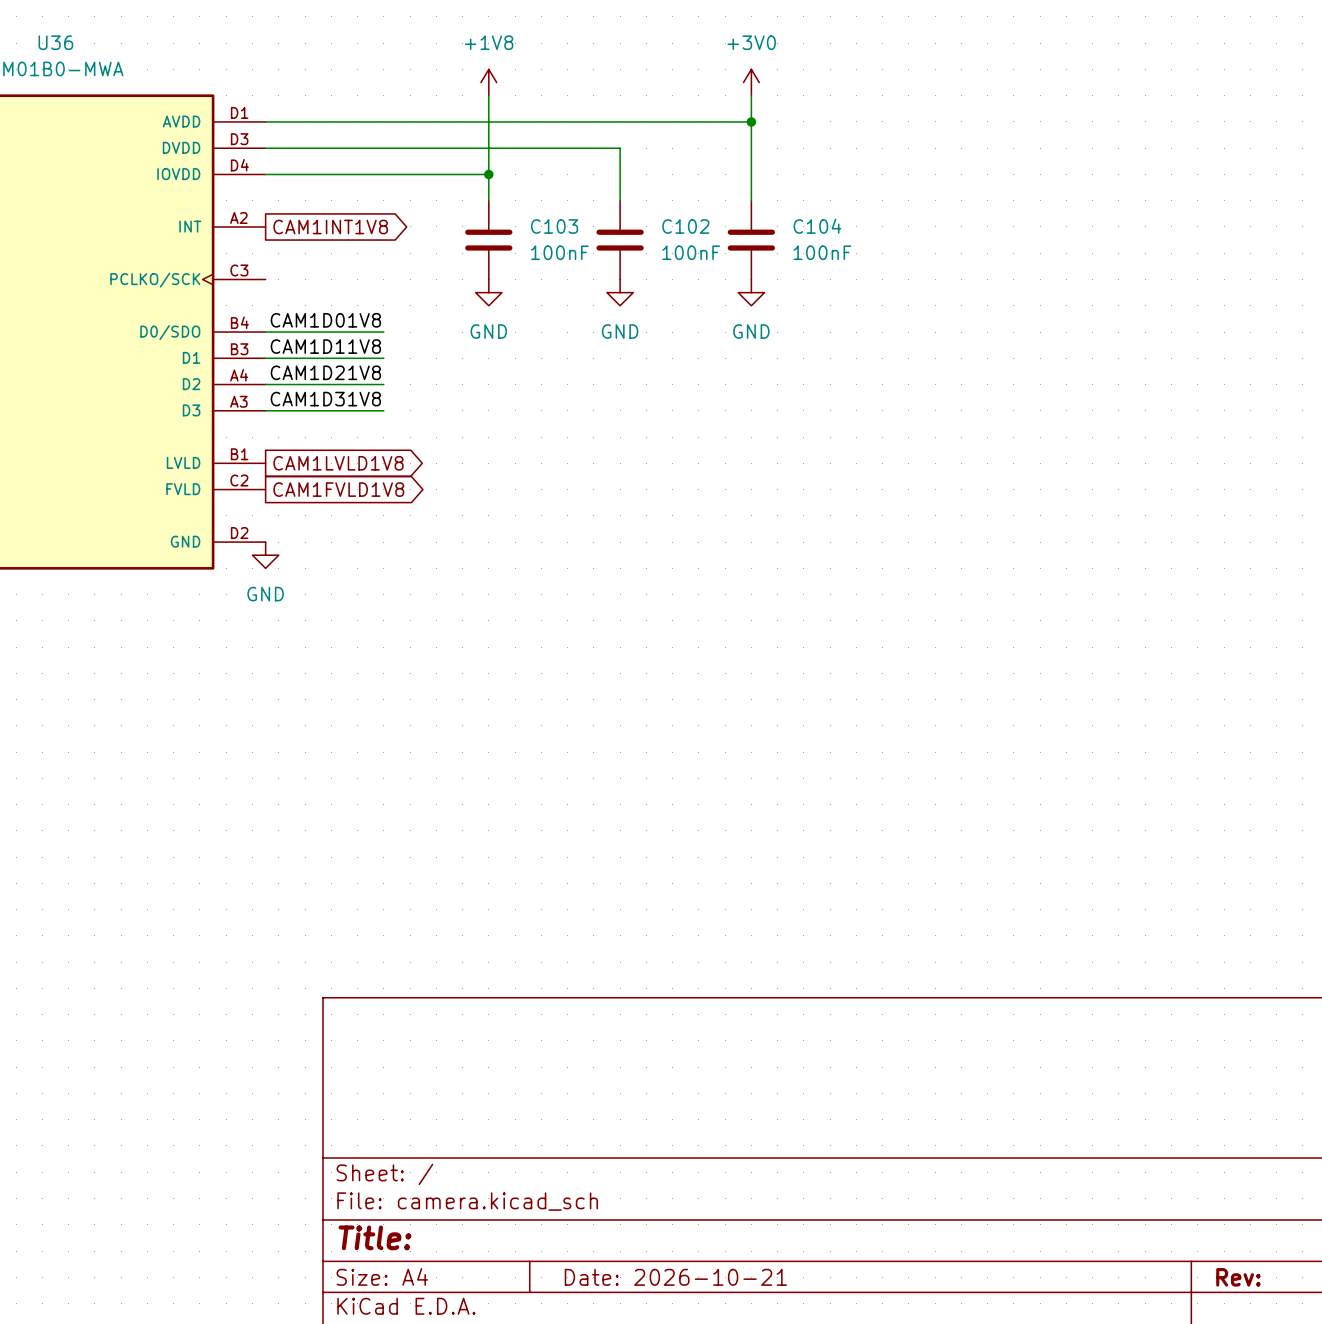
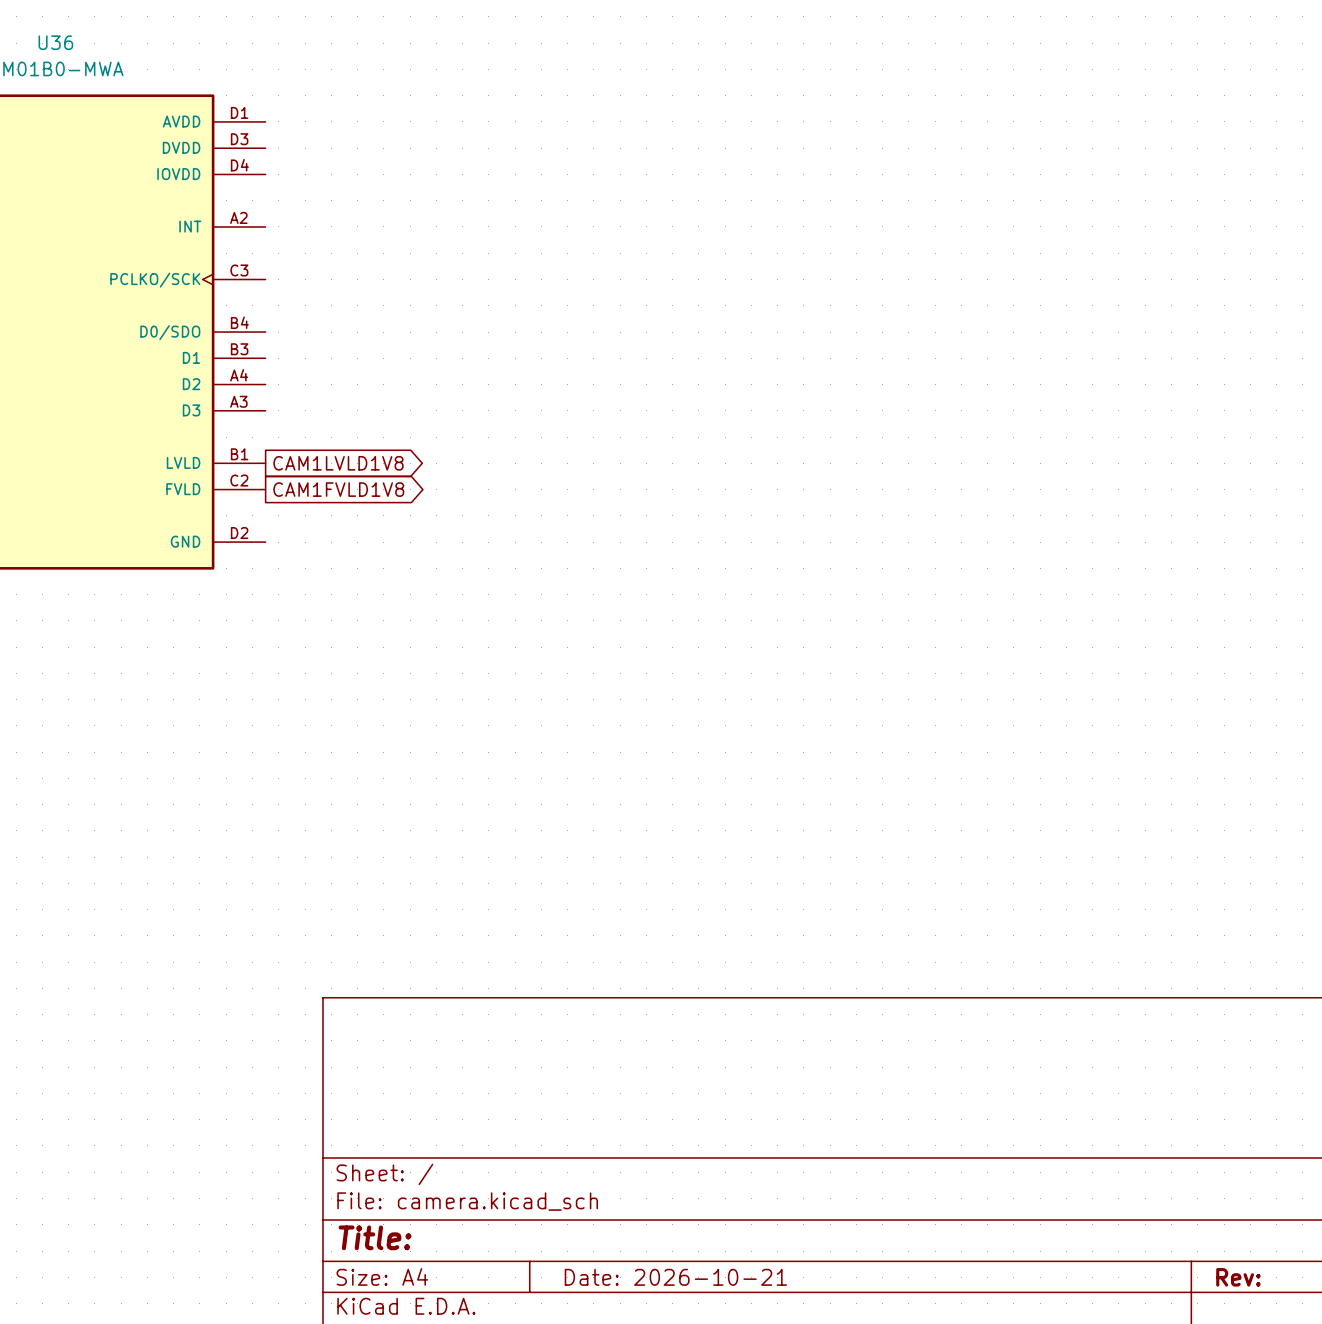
power symbol: +1V8 (488, 82) -> none
power symbol: +3V0 (751, 82) -> none
wire: (488, 95) (488, 200) -> none
wire: (751, 95) (751, 200) -> none
wire: (265, 121) (751, 121) -> none
junction: (751, 121) -> none
wire: (265, 148) (620, 148) (620, 200) -> none
wire: (265, 174) (488, 174) -> none
junction: (488, 174) -> none
global label: CAM1INT1V8 (330, 226) -> none
C103: 100nF (488, 240) -> none
C102: 100nF (620, 240) -> none
C104: 100nF (751, 240) -> none
power symbol: GND (488, 292) -> none
power symbol: GND (620, 292) -> none
power symbol: GND (751, 292) -> none
label: CAM1D01V8 (325, 320) -> none
wire: (265, 332) (383, 332) -> none
label: CAM1D11V8 (325, 346) -> none
wire: (265, 358) (383, 358) -> none
label: CAM1D21V8 (325, 372) -> none
wire: (265, 384) (383, 384) -> none
label: CAM1D31V8 (325, 399) -> none
wire: (265, 410) (383, 410) -> none
power symbol: GND (265, 555) -> none

